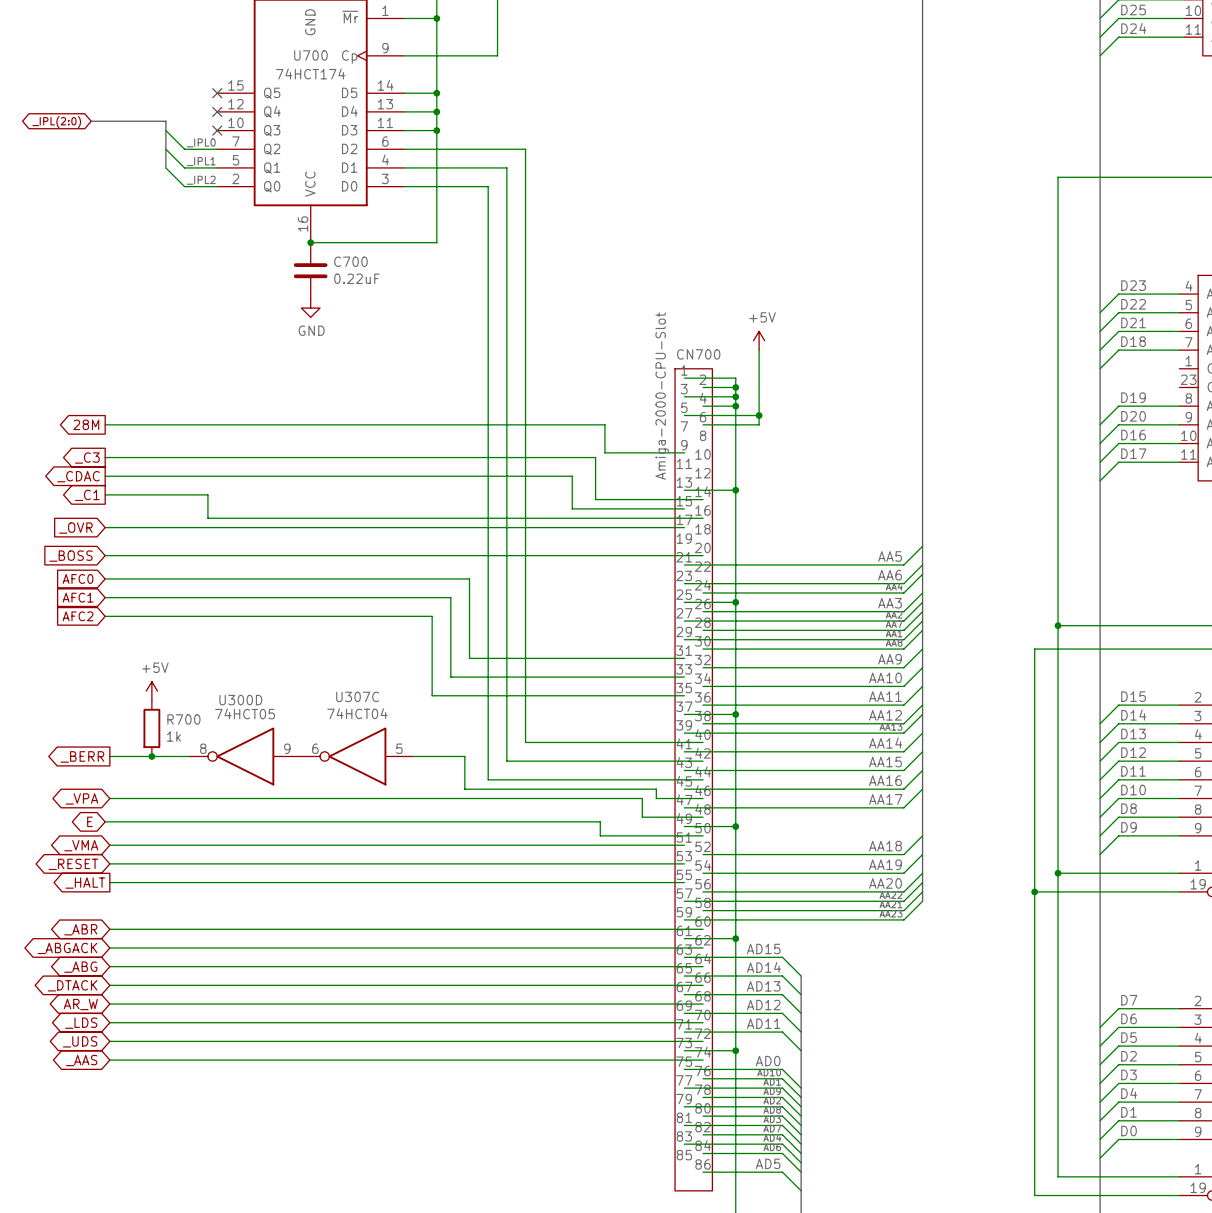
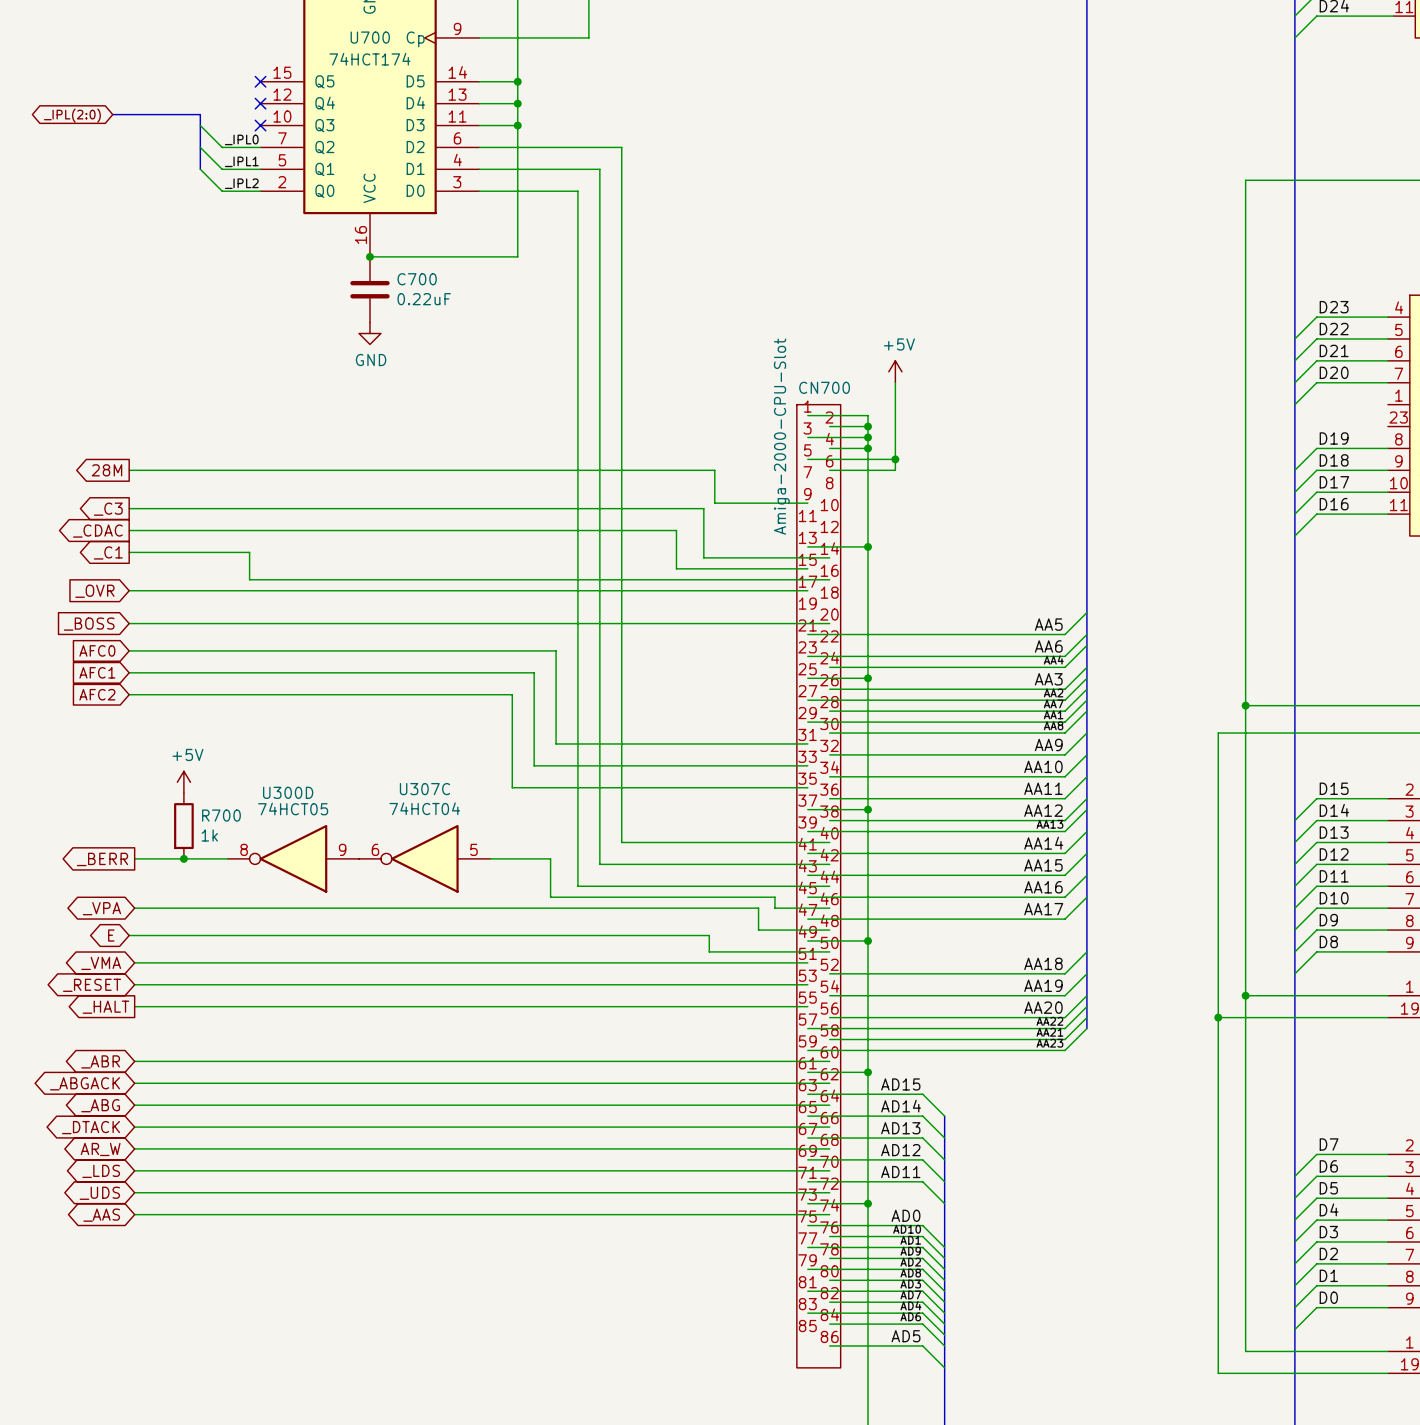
label: D18 (1133, 341) -> D20 (1334, 372)
label: D20 (1133, 416) -> D18 (1334, 460)
label: D16 (1133, 435) -> D17 (1334, 482)
label: D17 (1133, 453) -> D16 (1334, 504)
label: D8 (1129, 808) -> D9 (1328, 920)
label: D9 (1129, 827) -> D8 (1328, 942)
label: D2 (1129, 1056) -> D4 (1329, 1209)
label: D4 (1129, 1093) -> D2 (1328, 1253)

